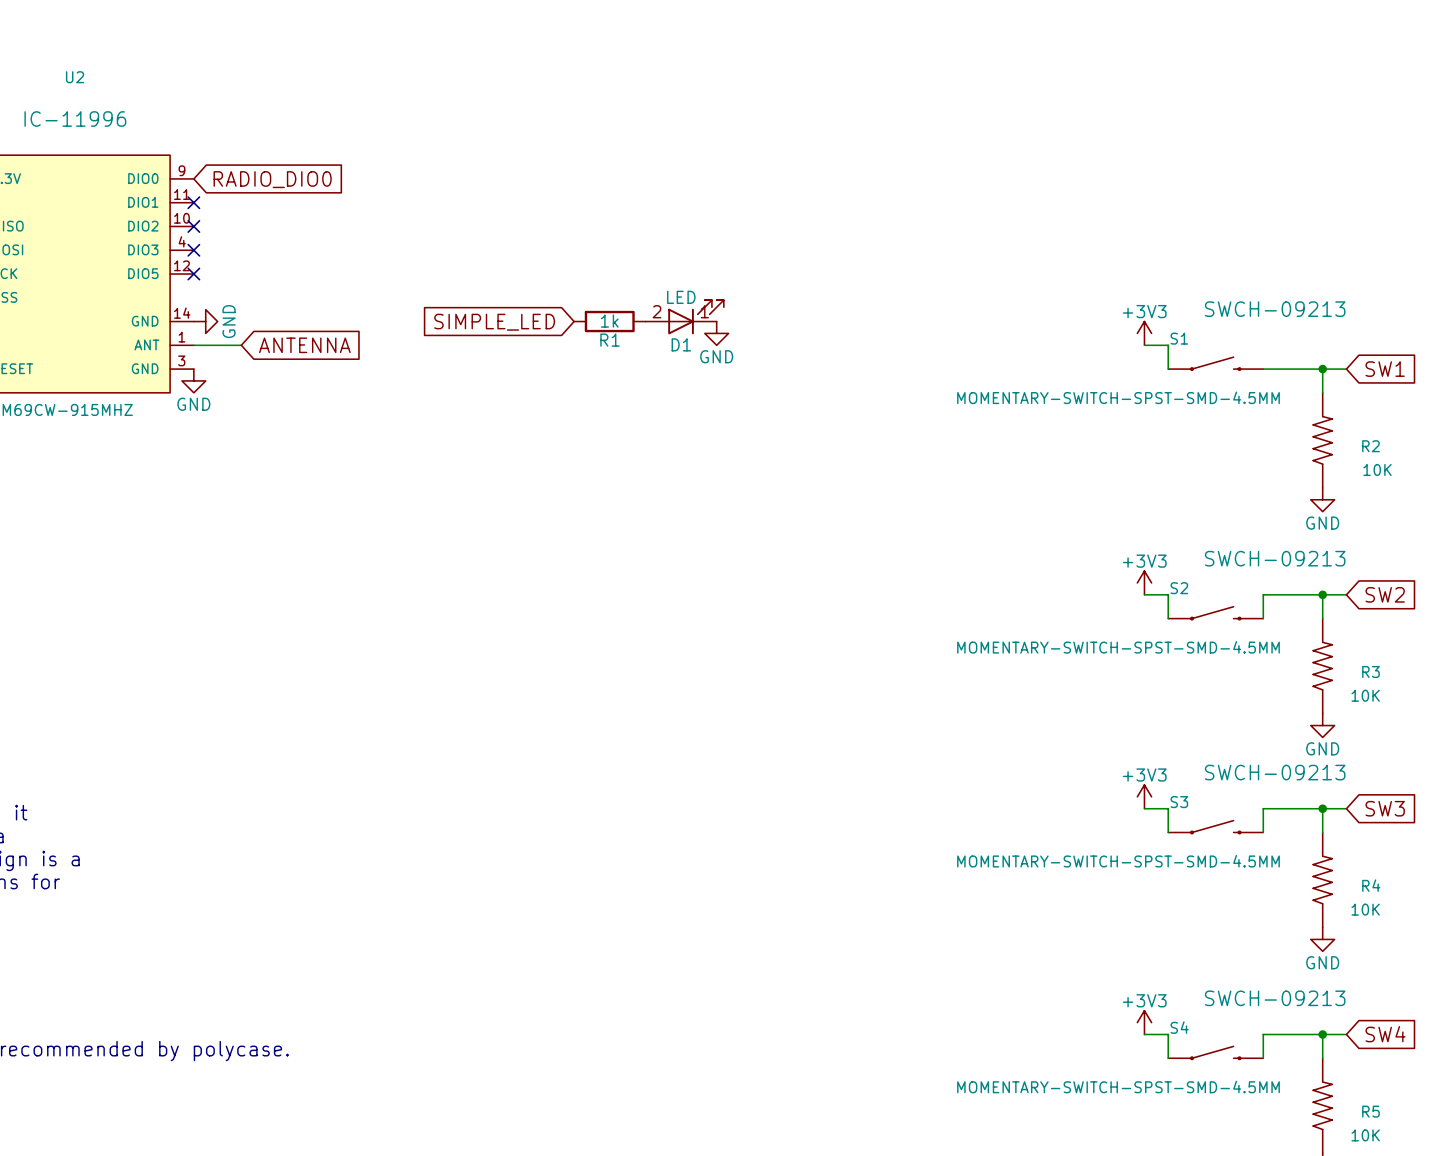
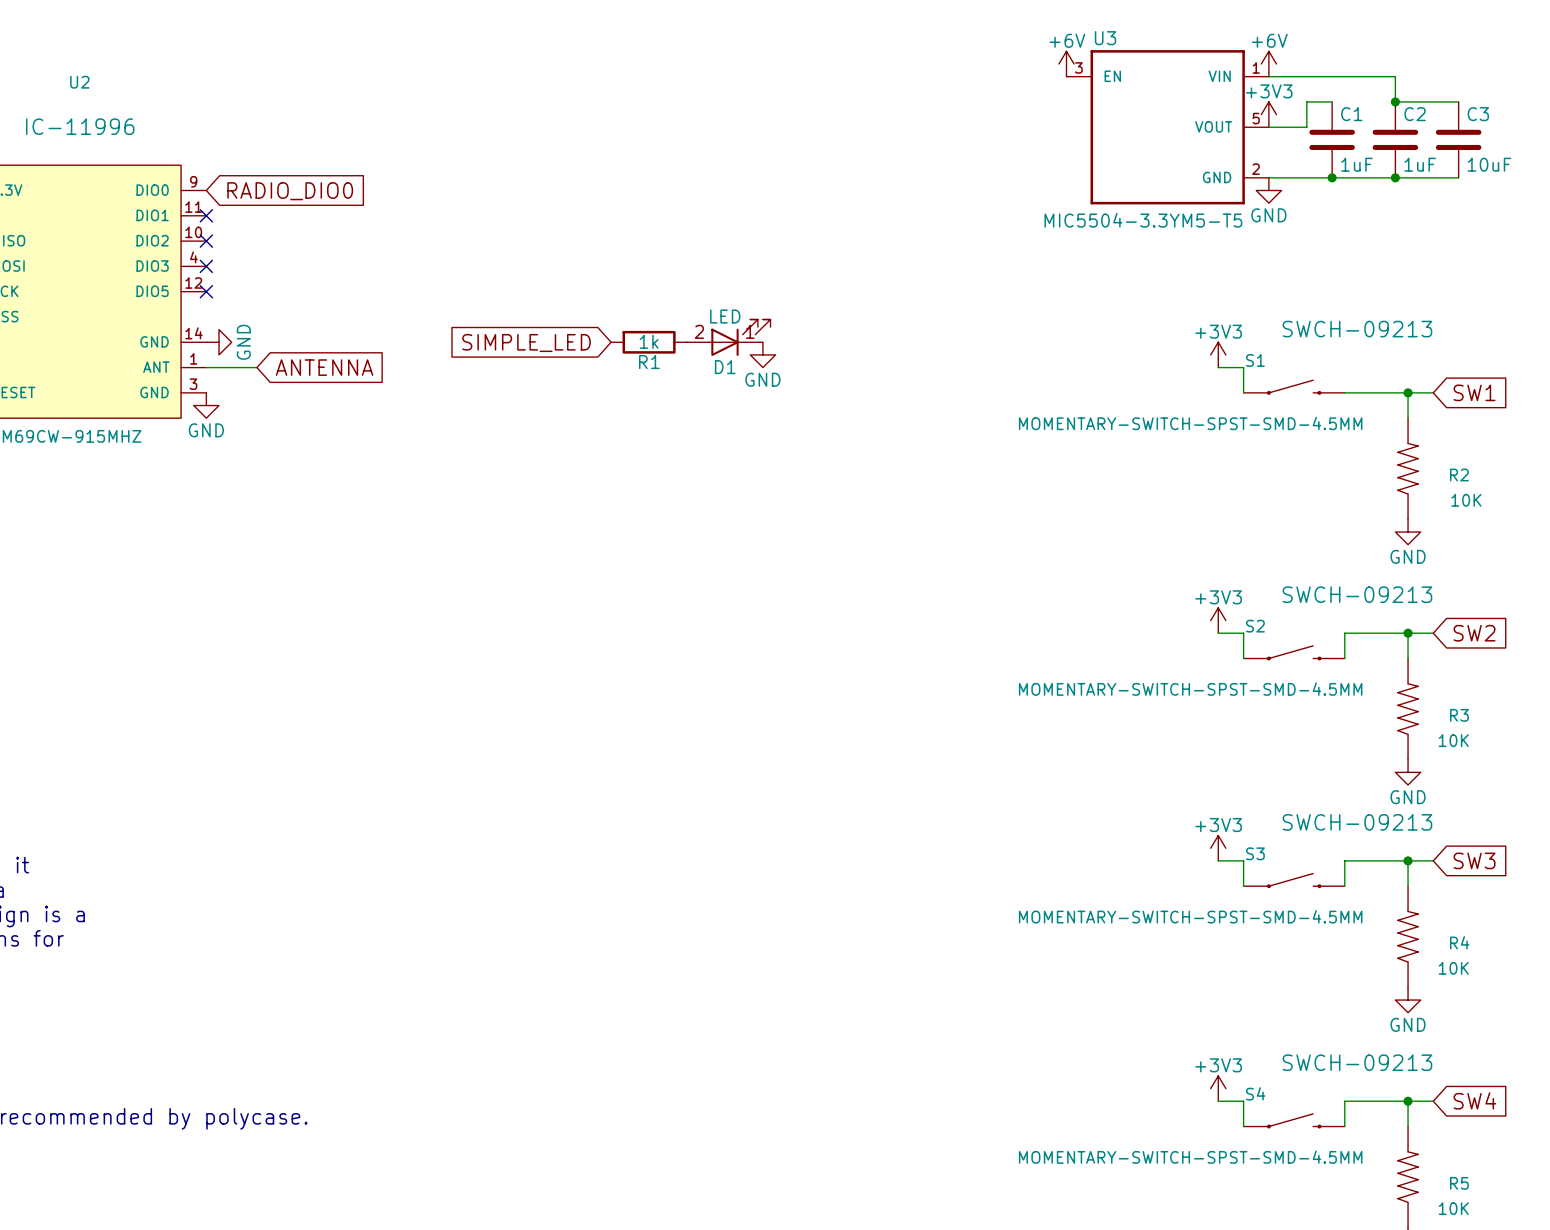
power symbol: none -> +6V (1066, 64)
power symbol: none -> +6V (1268, 64)
wire: none -> (1268, 76) (1395, 76) (1395, 101) (1458, 101)
wire: none -> (1332, 101) (1306, 101) (1306, 127) (1268, 127)
junction: none -> (1395, 101)
power symbol: none -> +3V3 (1268, 114)
U3: none -> MIC5504-3.3YM5-T5 (1167, 127)
C1: none -> 1uF (1332, 139)
C2: none -> 1uF (1395, 139)
C3: none -> 10uF (1458, 139)
wire: none -> (1268, 177) (1458, 177)
junction: none -> (1332, 177)
junction: none -> (1395, 177)
power symbol: none -> GND (1268, 190)

